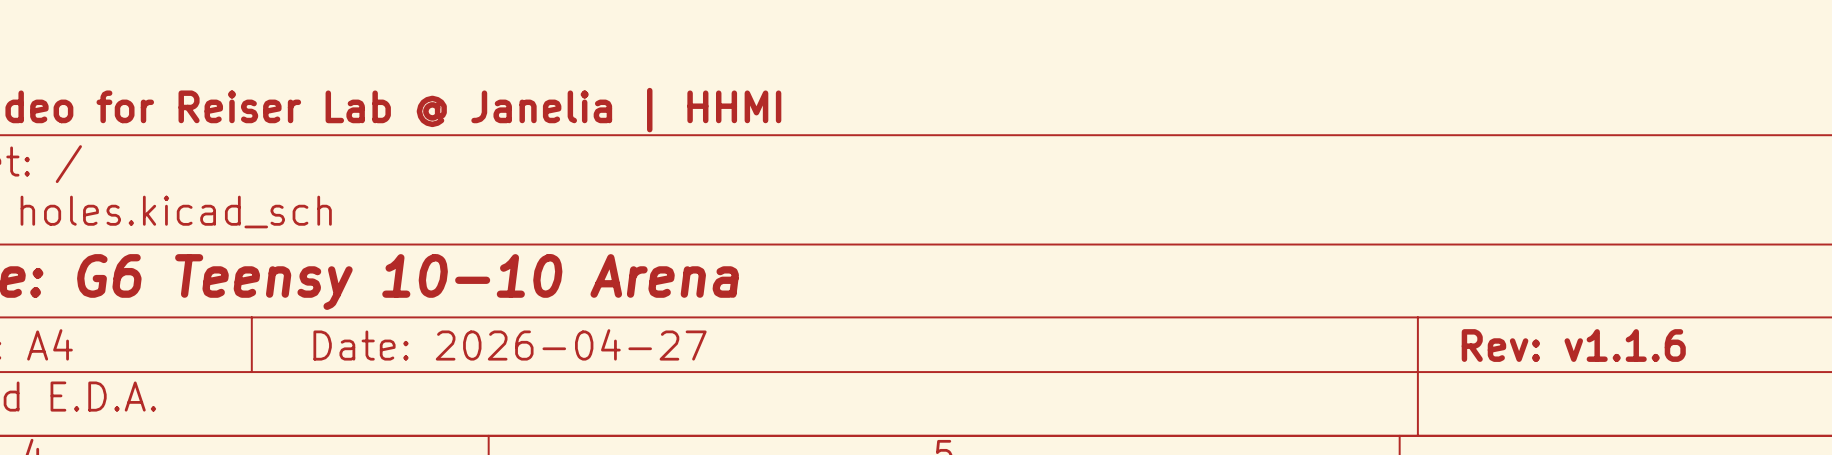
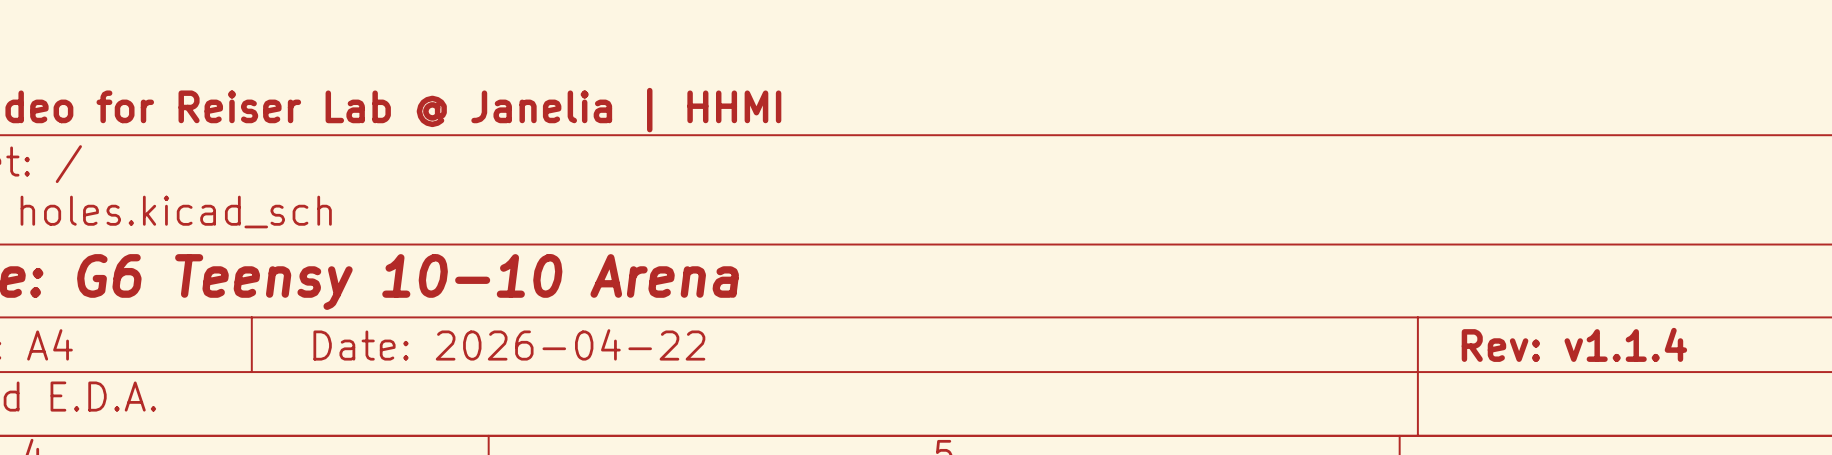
title block: Date: 2026-04-27 (510, 344) -> Date: 2026-04-22 (509, 344)
title block: Rev: v1.1.6 (1573, 345) -> Rev: v1.1.4 (1574, 344)

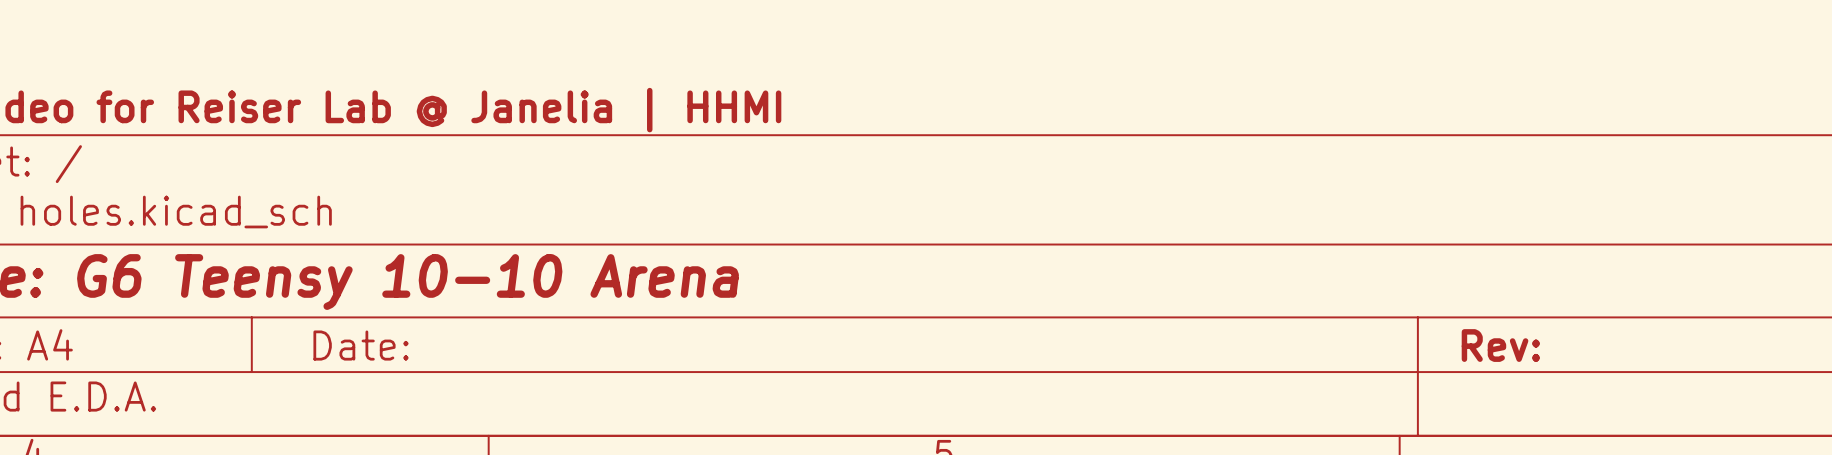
title block: Date: 2026-04-22 (509, 344) -> Date: (361, 345)
title block: Rev: v1.1.4 (1574, 344) -> Rev: (1500, 345)

